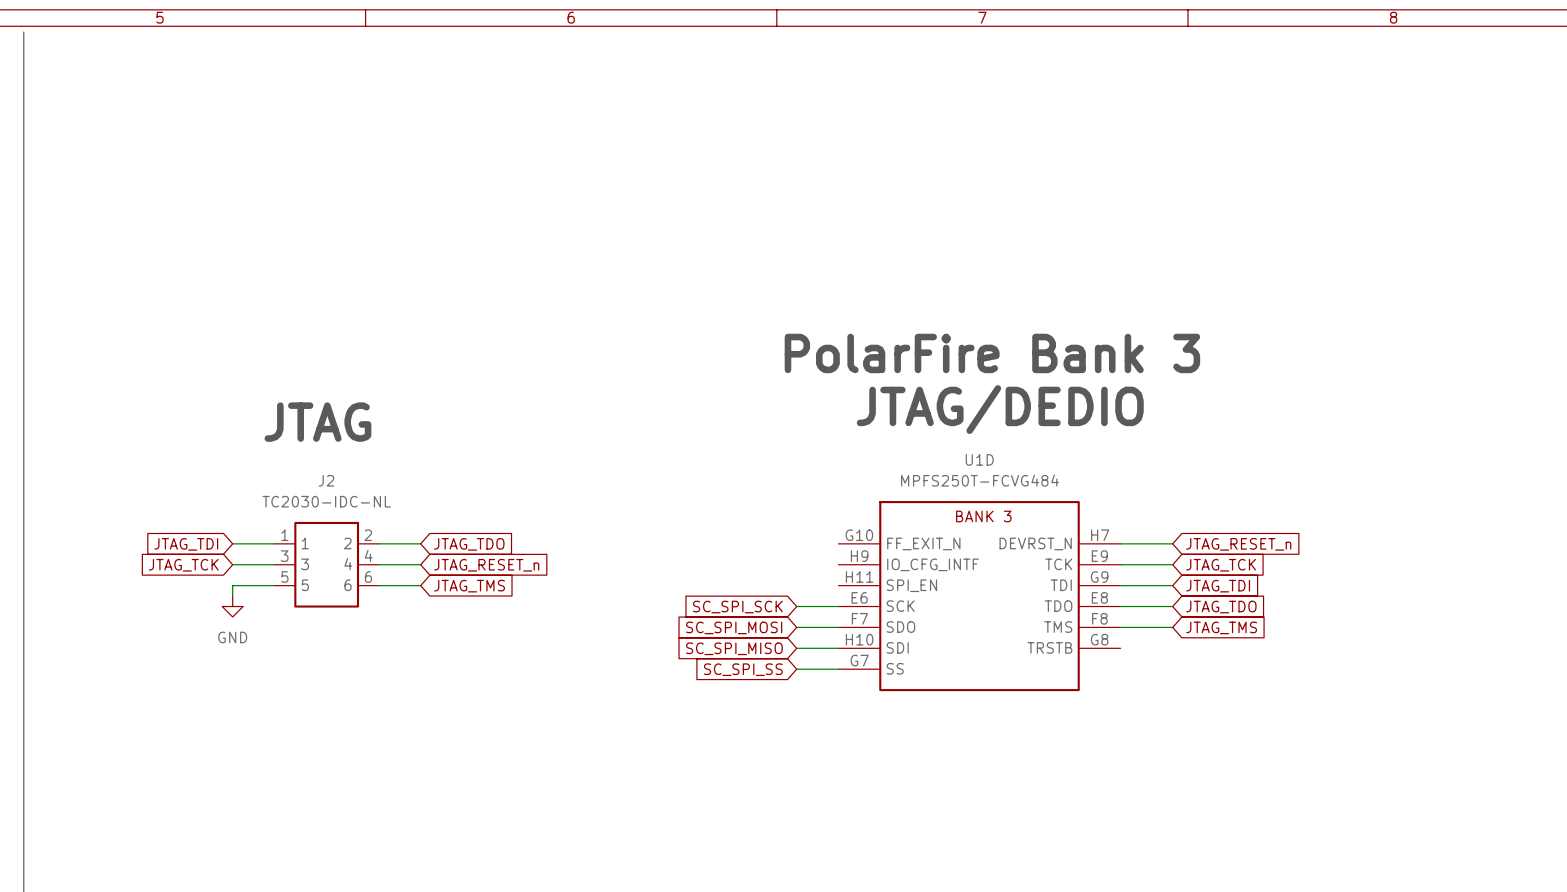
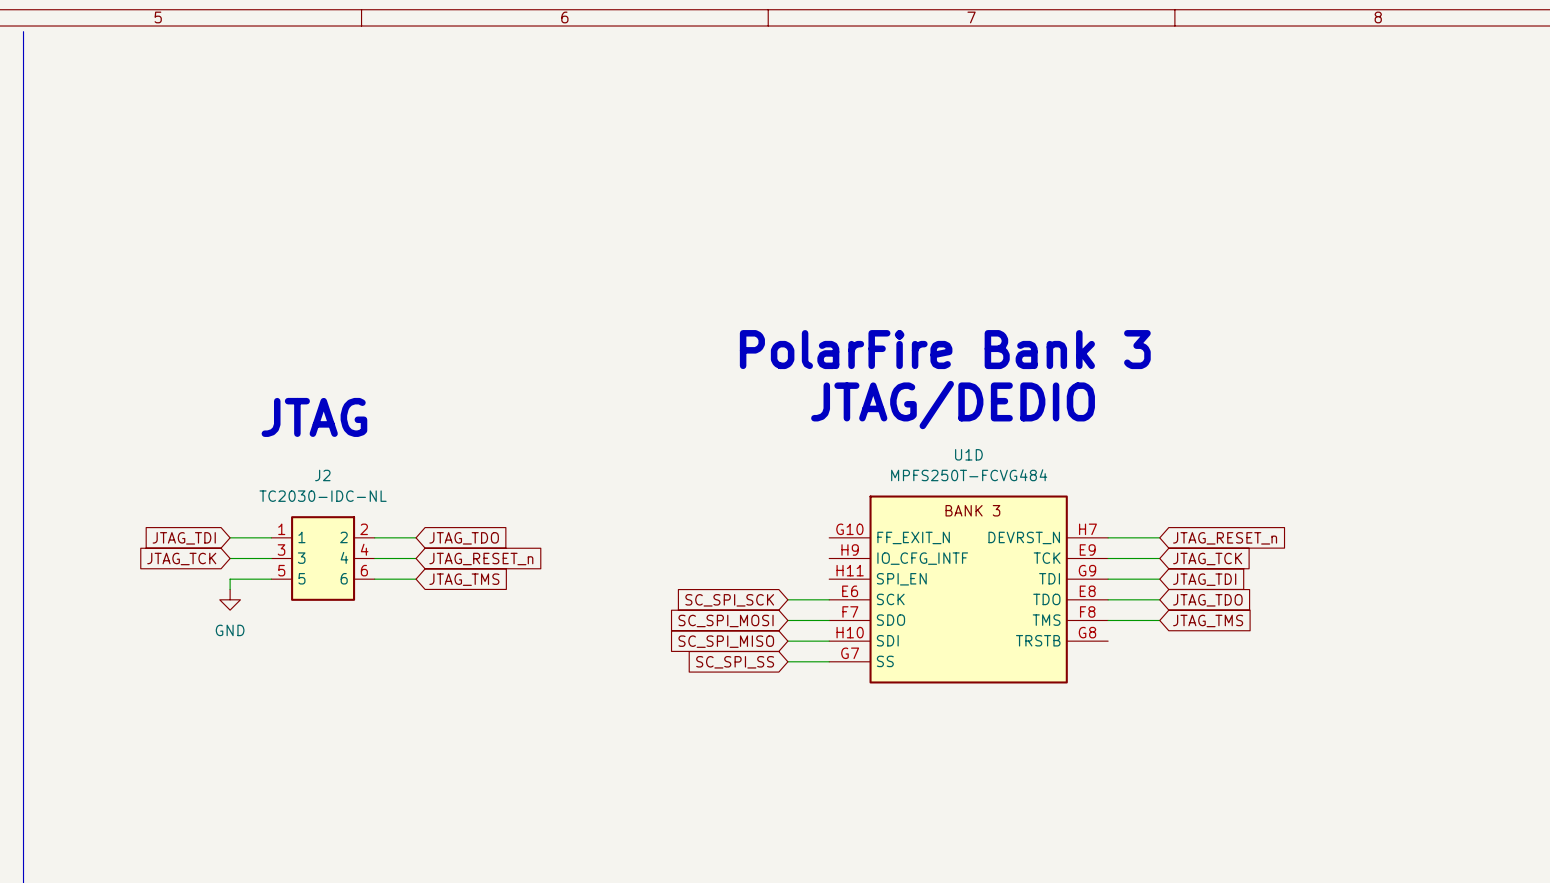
text position: PolarFire Bank 3 (992, 353) -> PolarFire Bank 3 (945, 349)
text position: JTAG/DEDIO (1000, 409) -> JTAG/DEDIO (953, 405)

